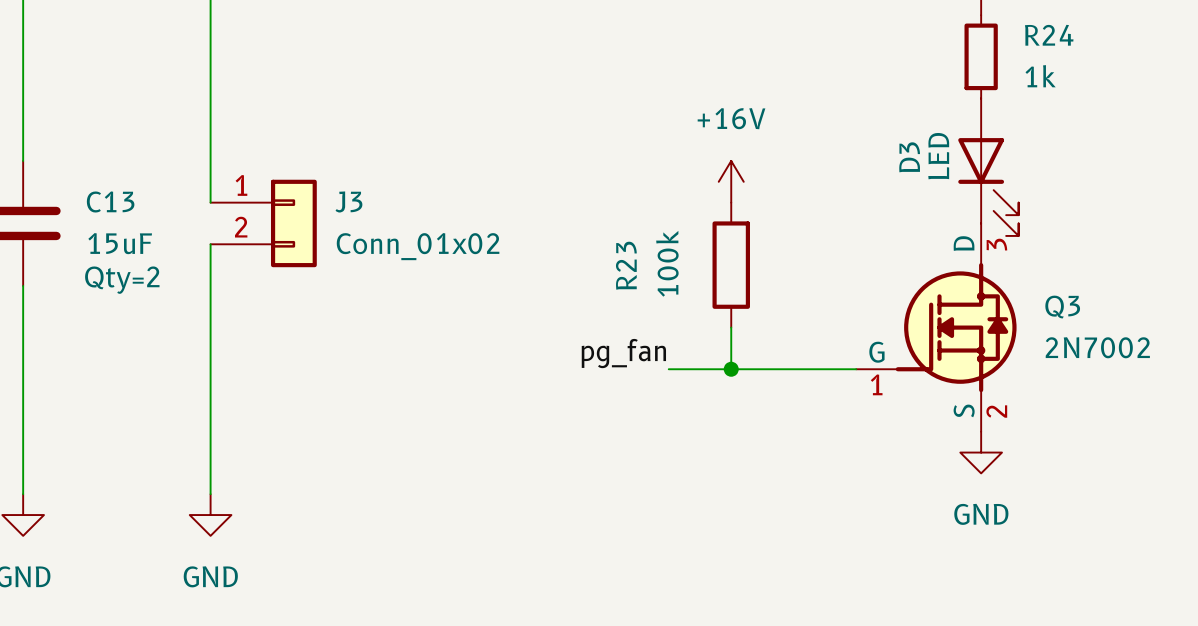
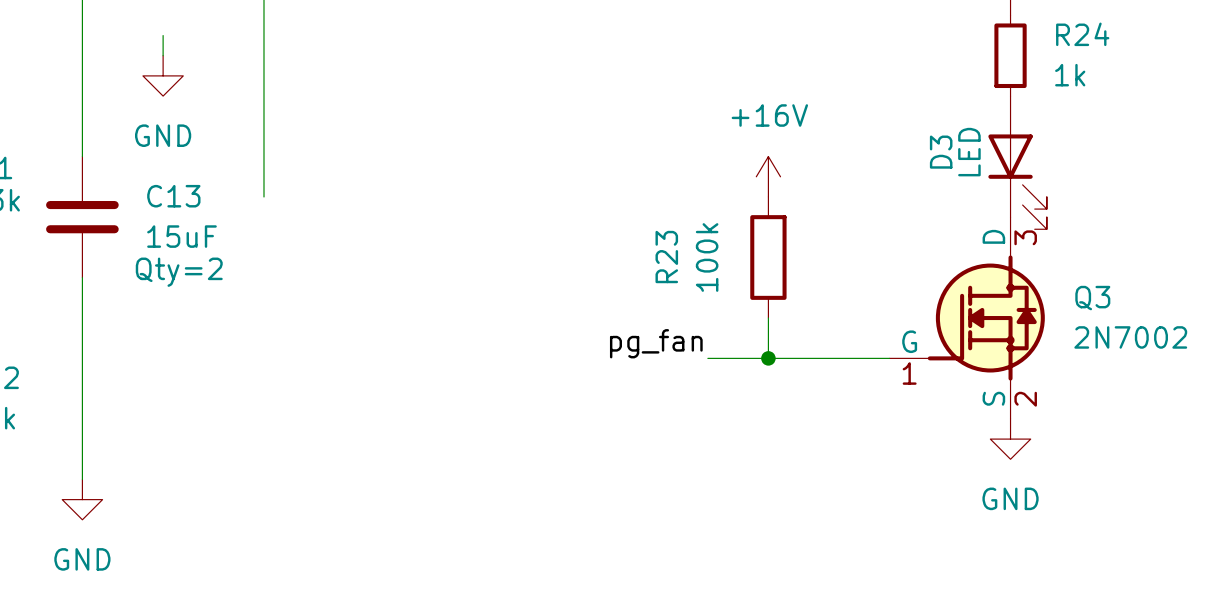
wire: none -> (163, 35) (163, 55)
power symbol: none -> GND (163, 75)
J3: Conn_01x02 (263, 223) -> none
wire: (210, 244) (210, 494) -> none
power symbol: GND (210, 515) -> none

